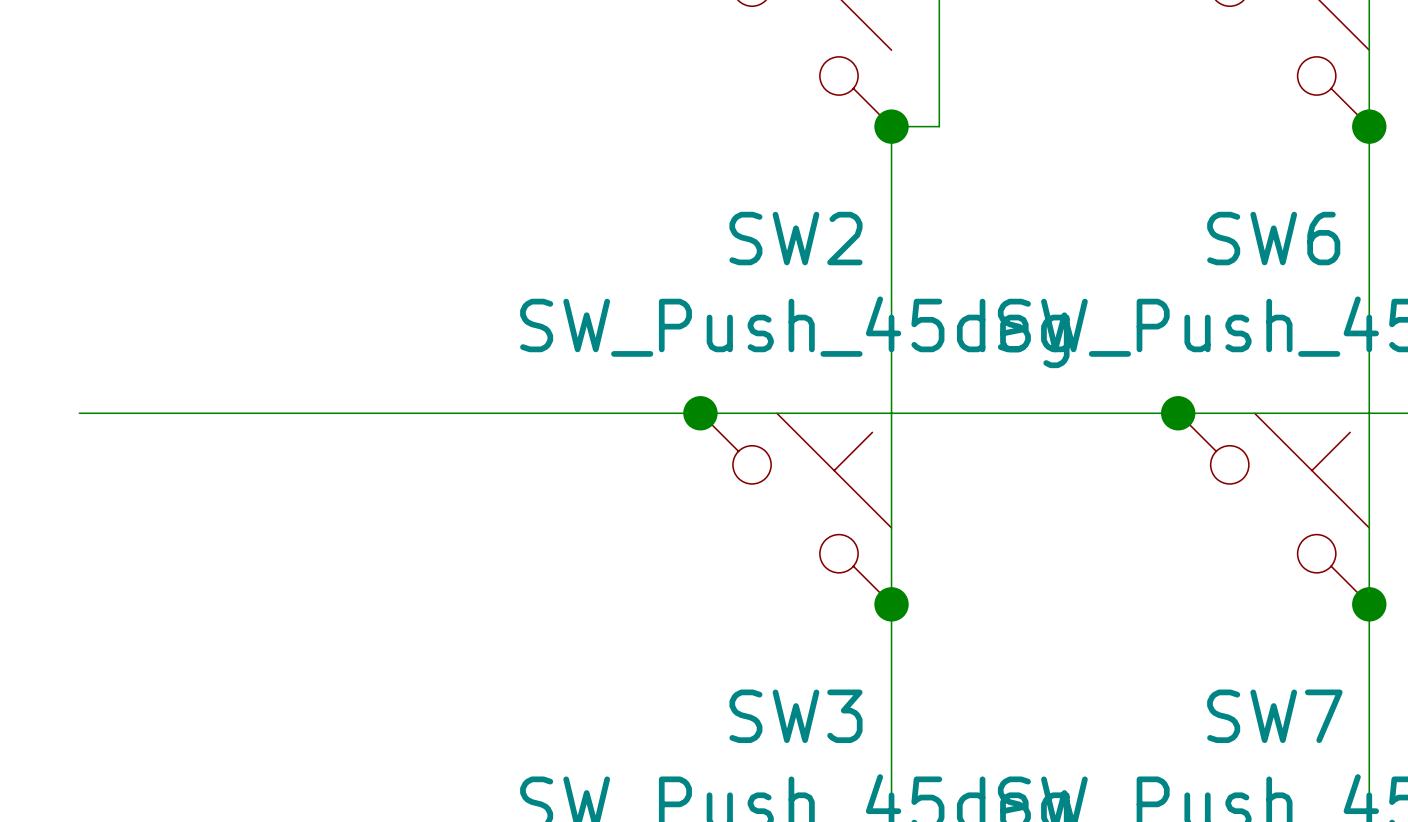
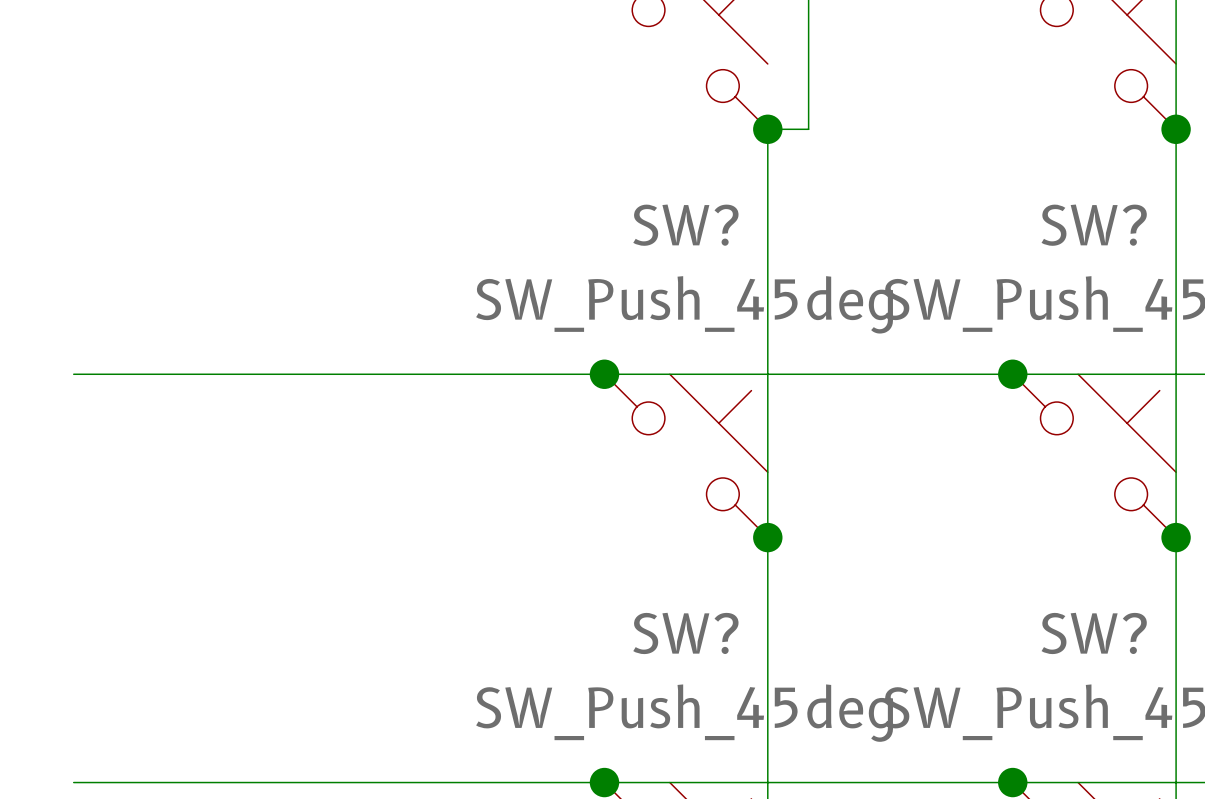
SW2 name: SW2 (795, 238) -> SW? (685, 225)
SW6 name: SW6 (1273, 238) -> SW? (1094, 225)
SW3 name: SW3 (795, 716) -> SW? (685, 633)
SW7 name: SW7 (1274, 716) -> SW? (1094, 633)

